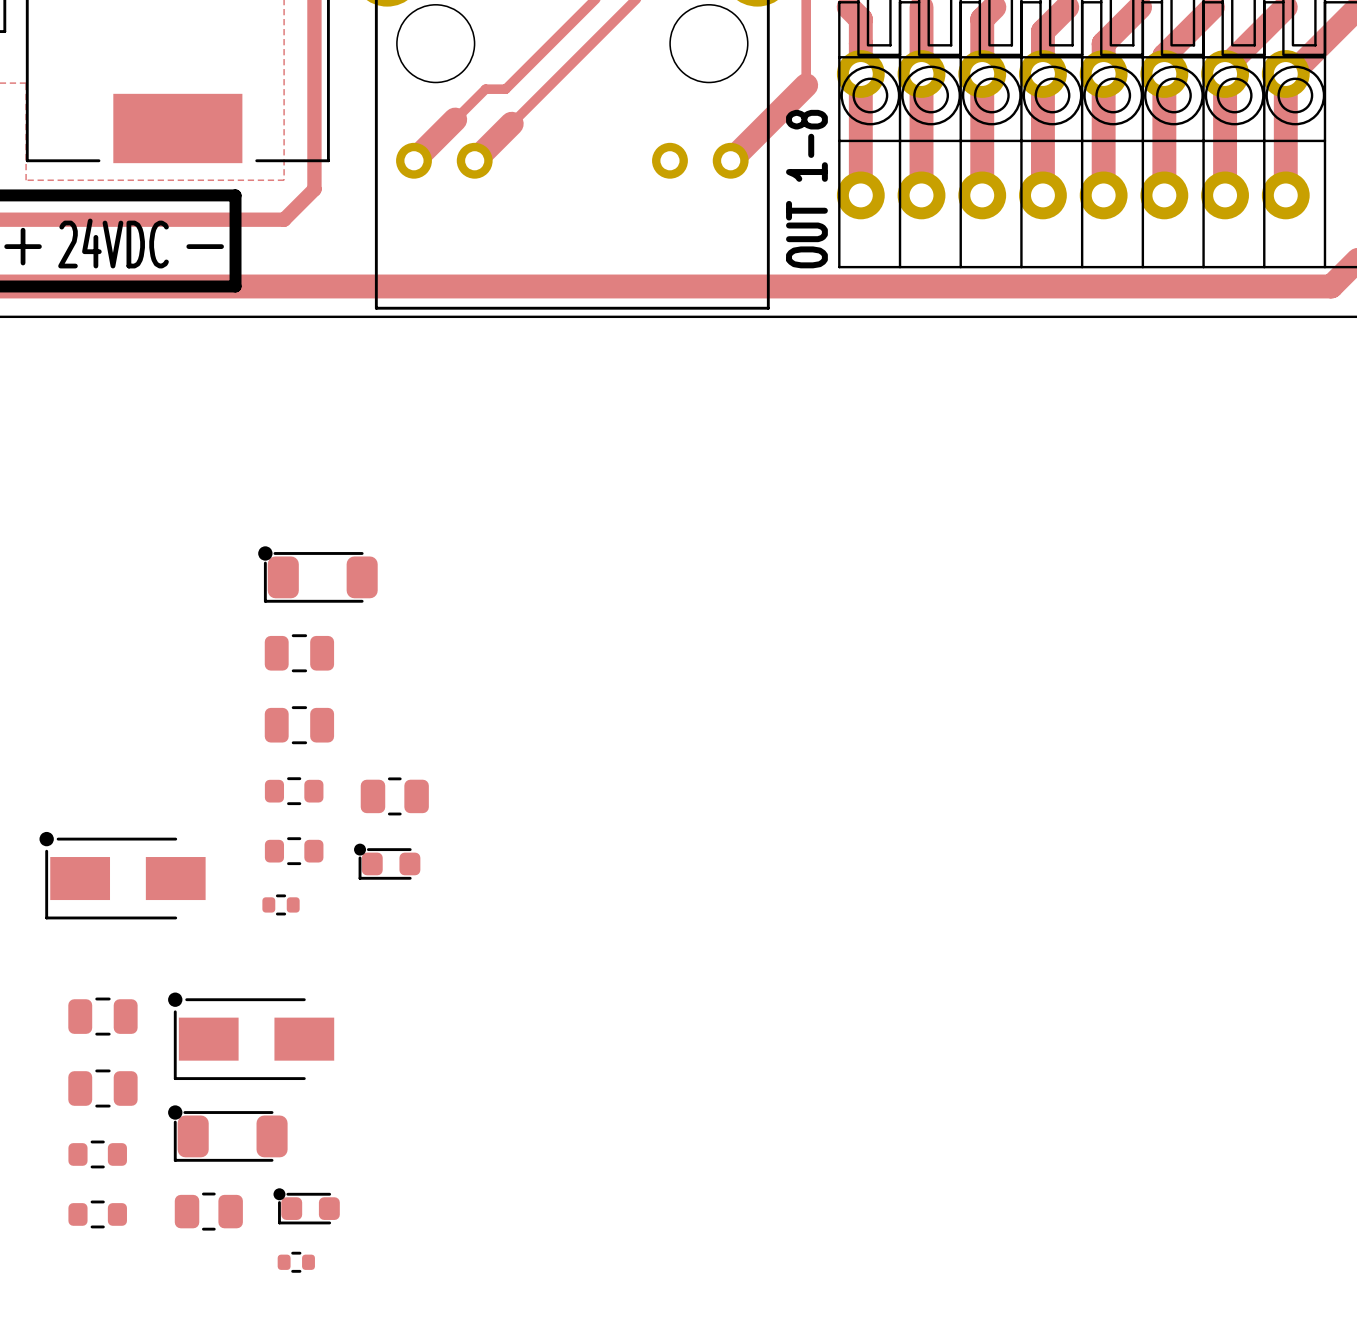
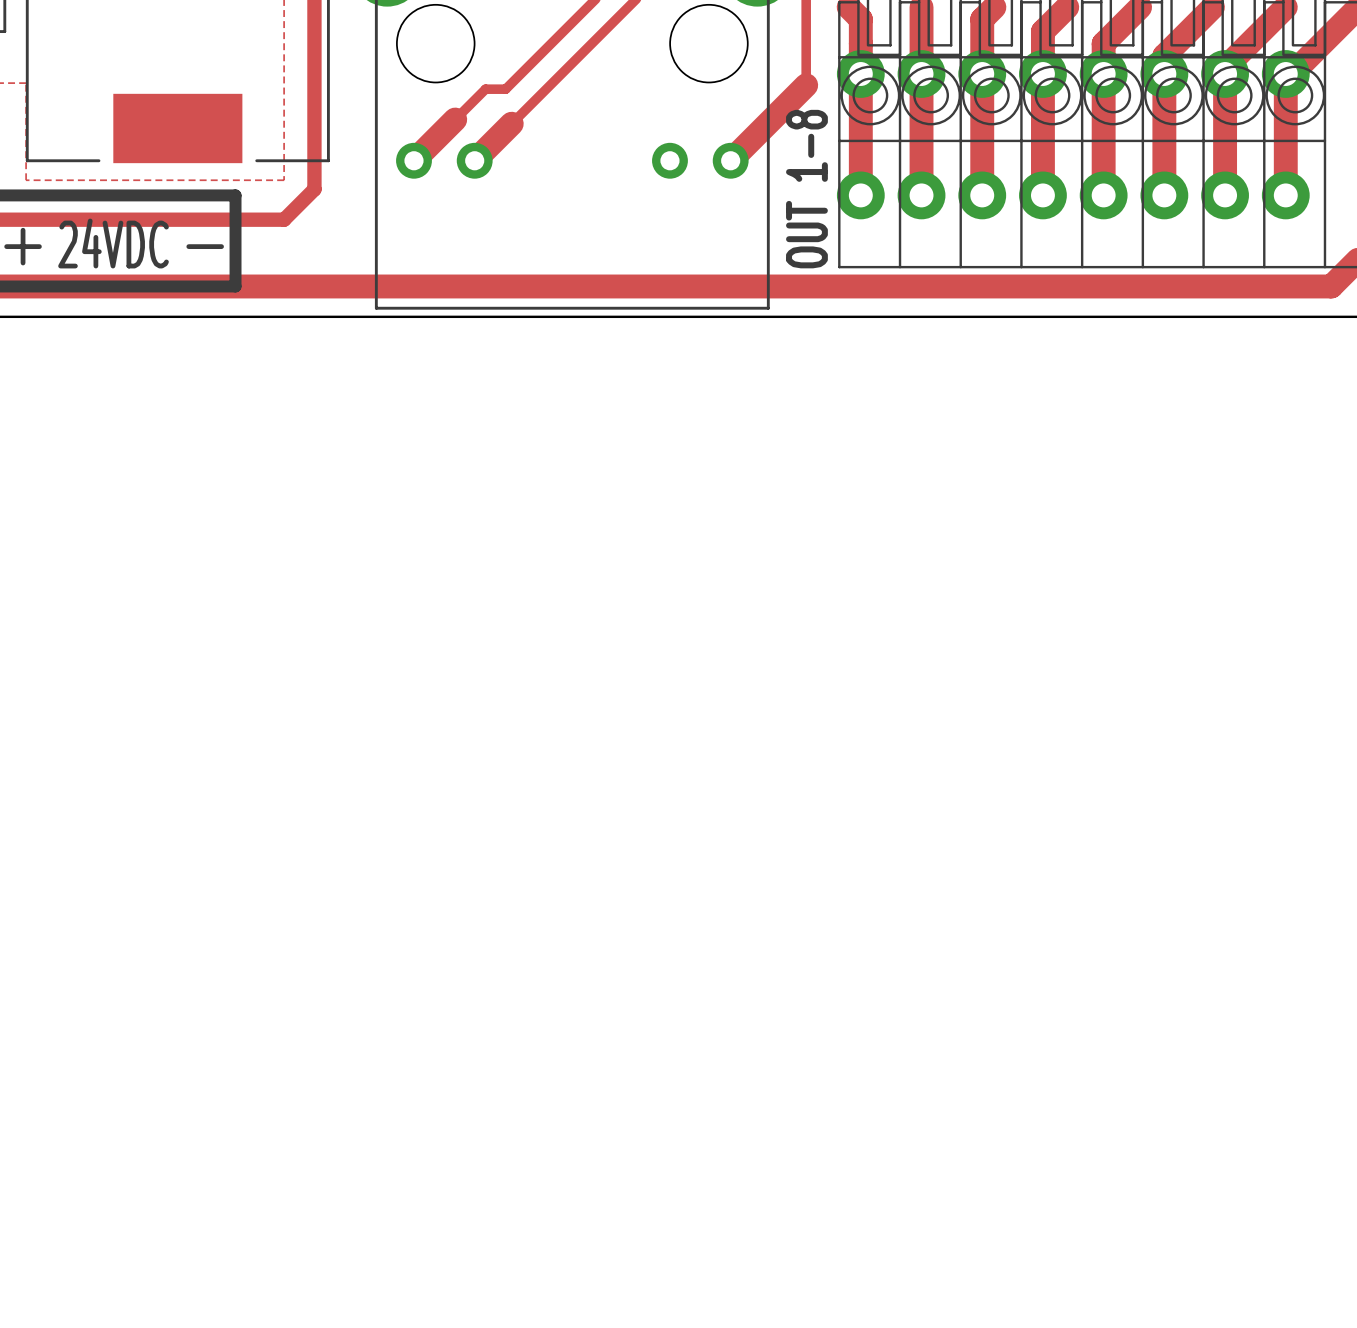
part: (317, 574) -> none
part: (299, 653) -> none
part: (299, 725) -> none
part: (294, 791) -> none
part: (394, 796) -> none
part: (294, 851) -> none
part: (387, 861) -> none
part: (122, 875) -> none
part: (281, 904) -> none
part: (102, 1016) -> none
part: (251, 1036) -> none
part: (102, 1088) -> none
part: (227, 1133) -> none
part: (97, 1154) -> none
part: (306, 1206) -> none
part: (208, 1211) -> none
part: (97, 1214) -> none
part: (296, 1262) -> none

